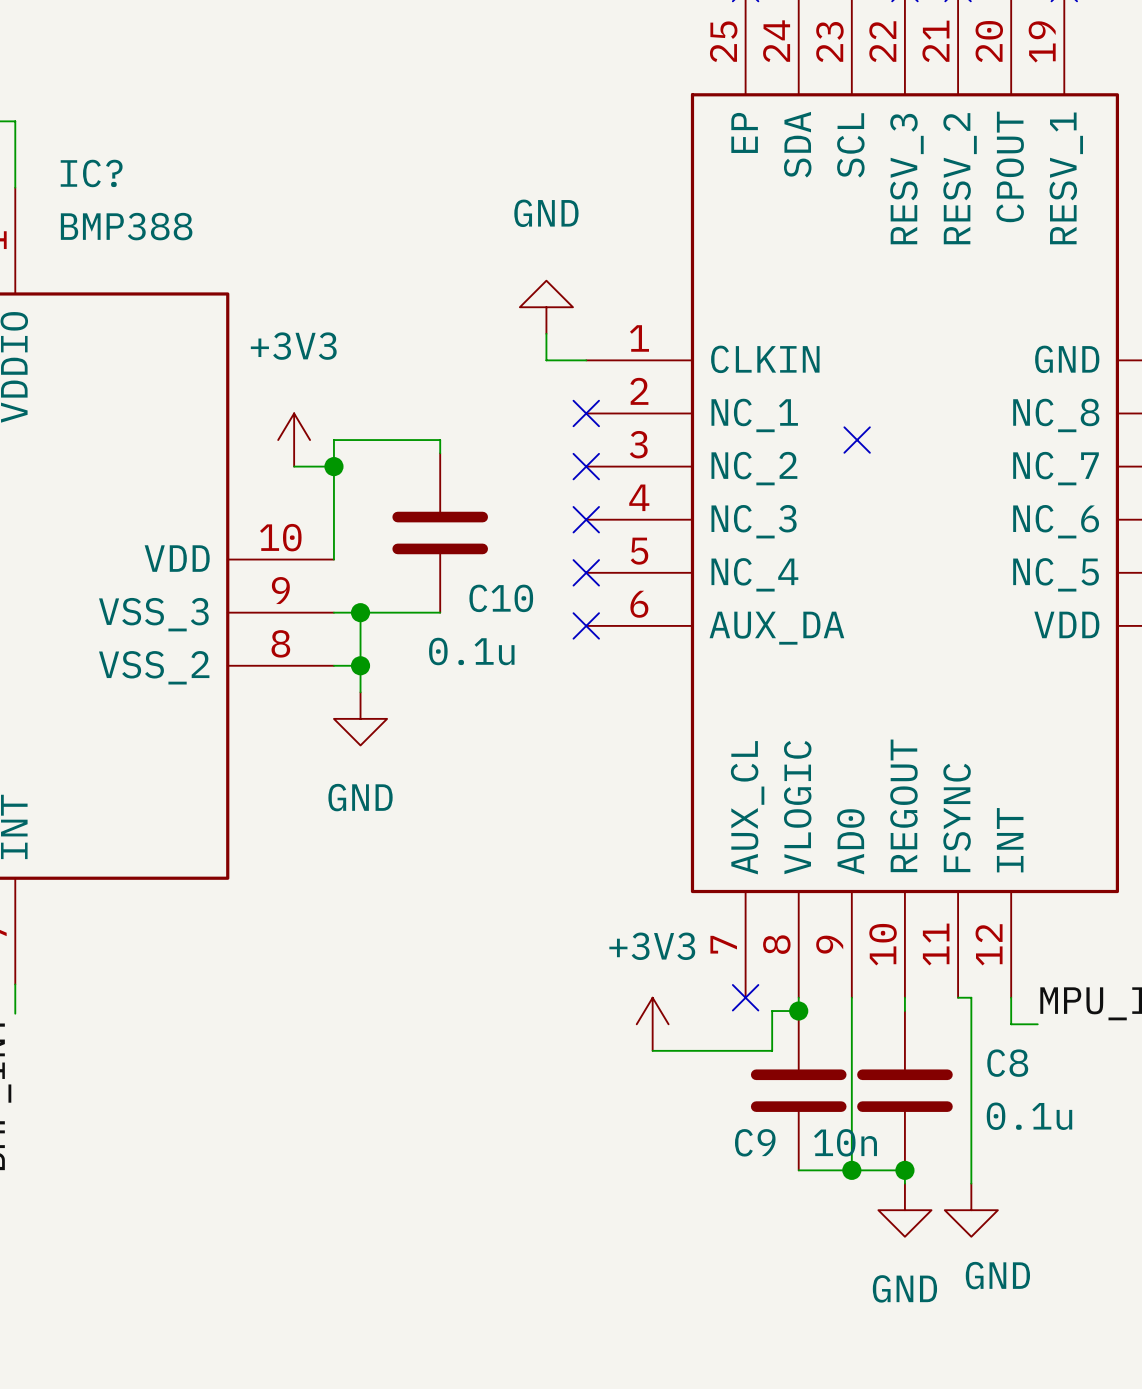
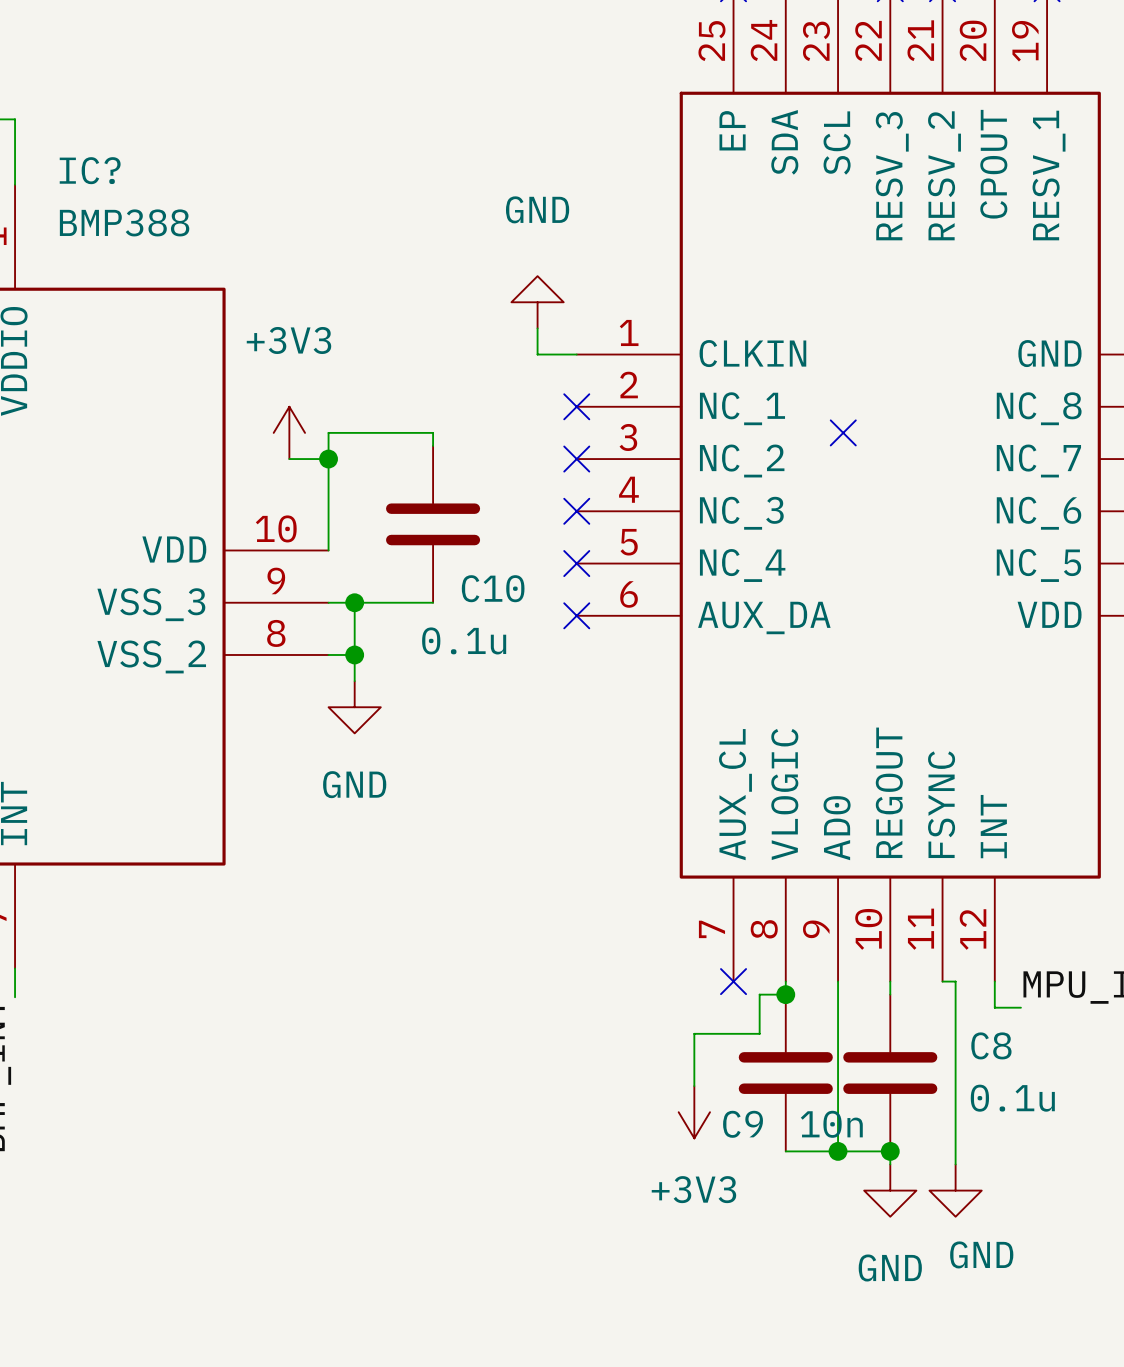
power symbol rotation: 0° (652, 1024) -> 180° (694, 1112)
power symbol position: +3V3 (652, 1024) -> +3V3 (694, 1112)
wire: (652, 1050) (705, 1050) -> (694, 1086) (694, 1033)

